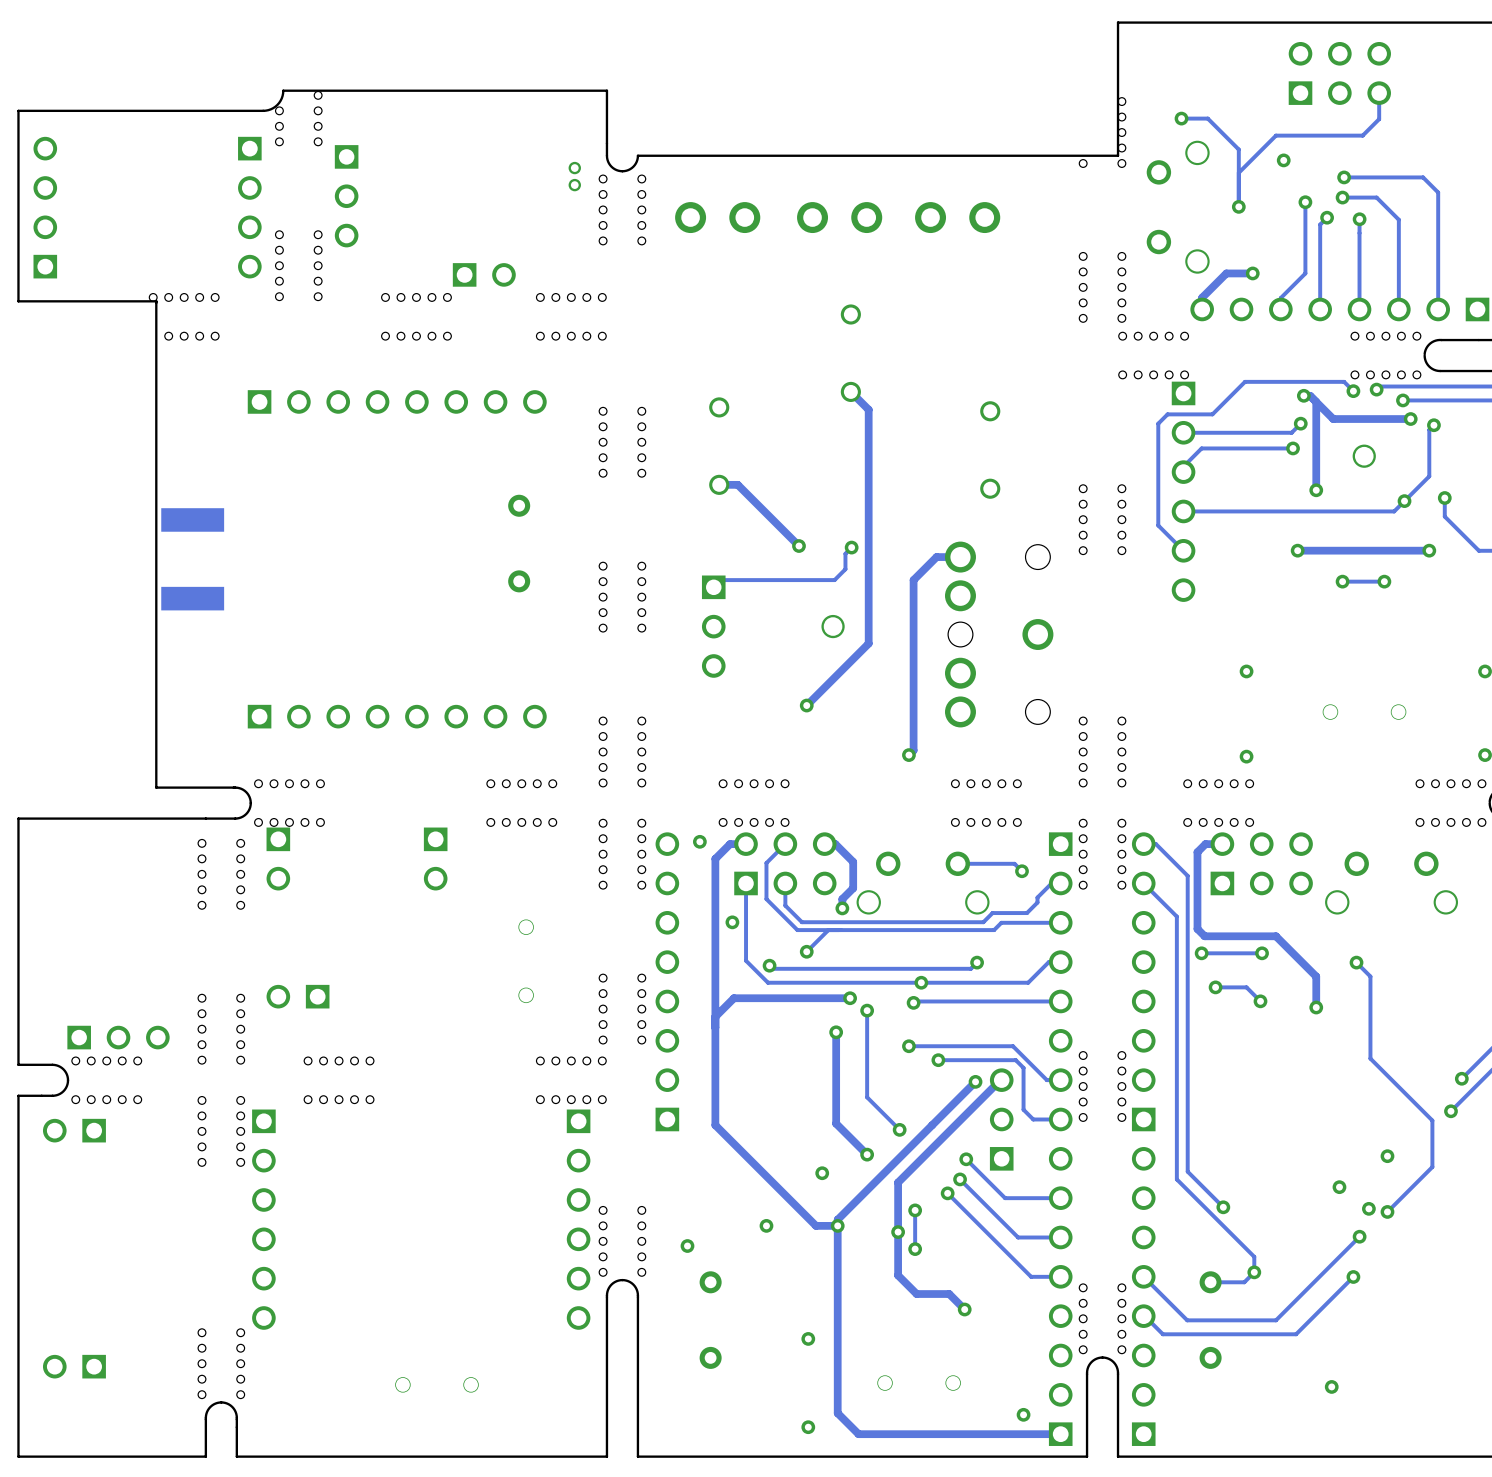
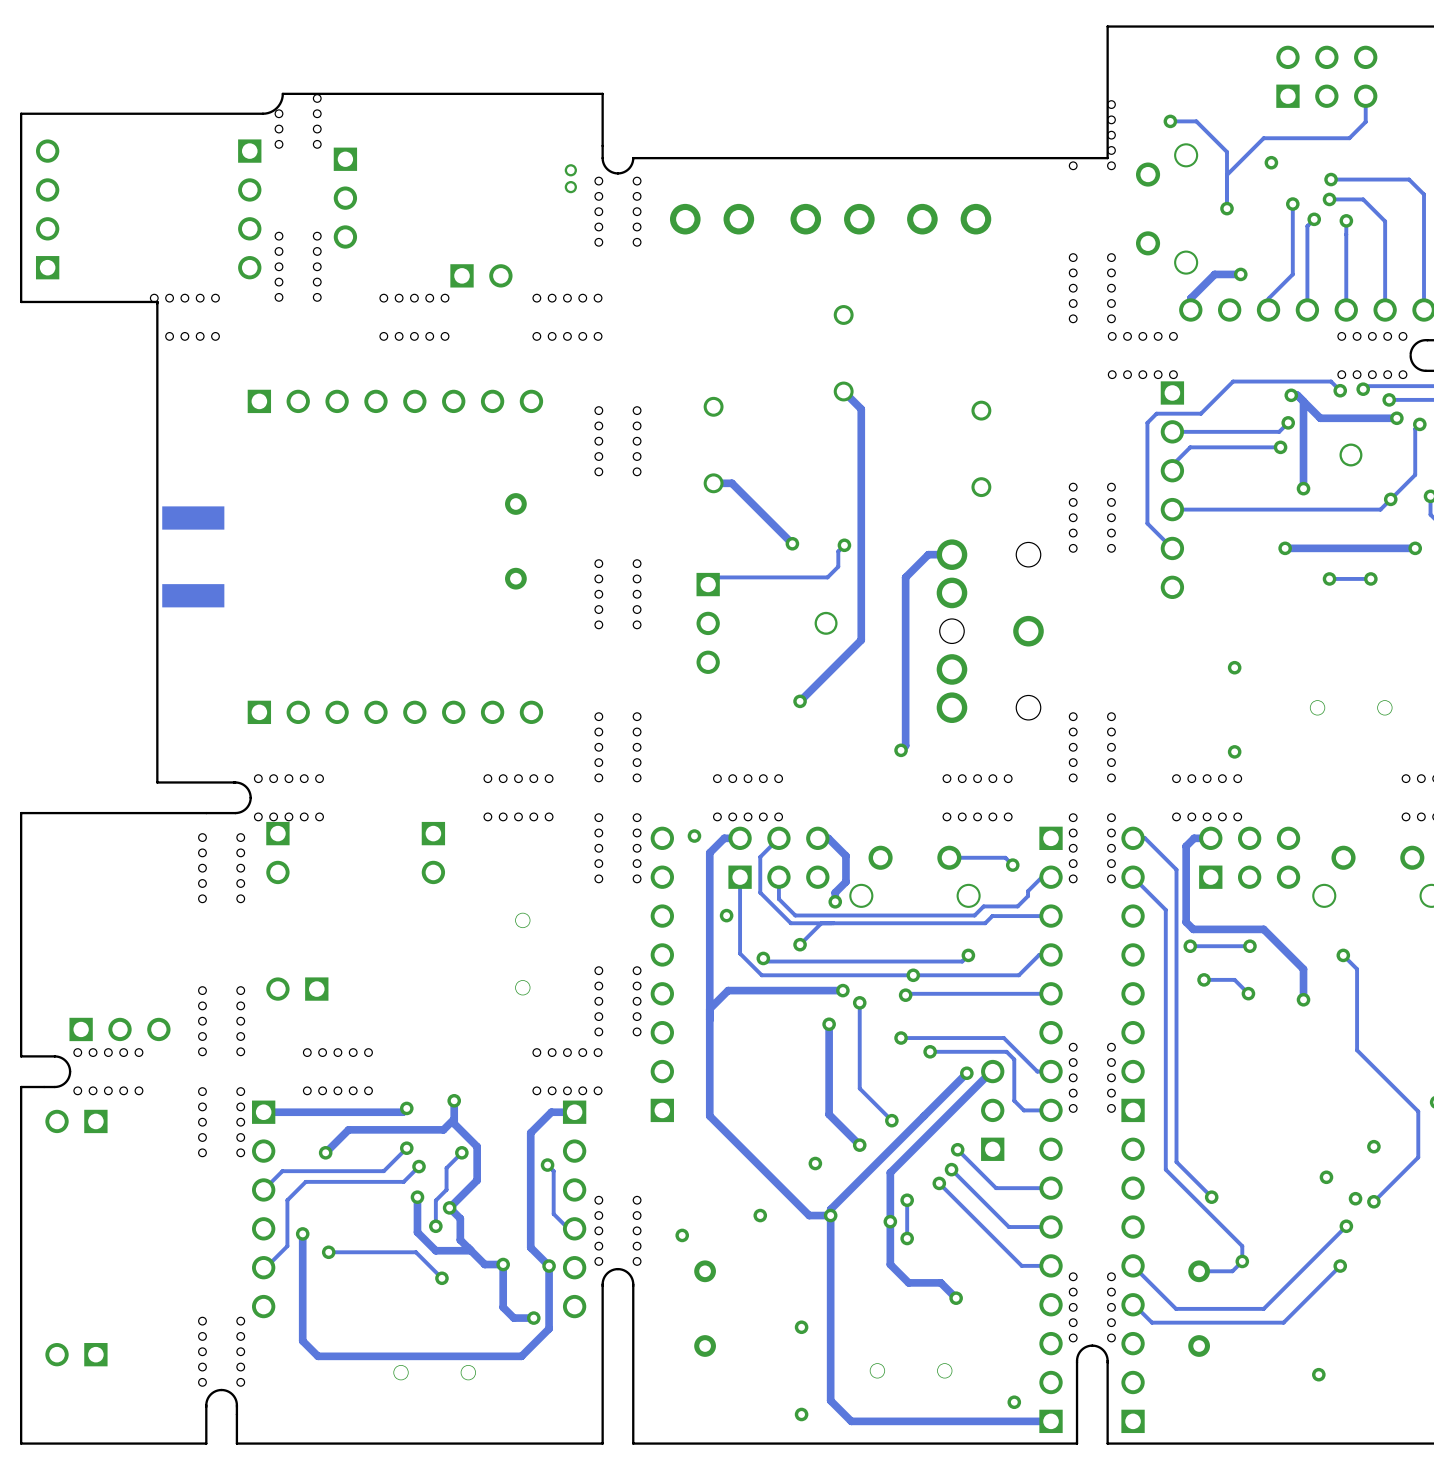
track: none -> (454, 1100) (454, 1123) (477, 1146) (477, 1180) (449, 1207) (460, 1218) (460, 1240) (484, 1264) (503, 1264) (503, 1307) (513, 1318) (533, 1318)
via: none -> (454, 1100)
track: none -> (406, 1108) (402, 1112) (263, 1112)
via: none -> (406, 1108)
track: none -> (574, 1112) (551, 1112) (530, 1132) (530, 1247) (549, 1266) (549, 1328) (521, 1356) (318, 1356) (302, 1341) (302, 1233)
track: none -> (454, 1119) (443, 1129) (348, 1129) (325, 1152)
track: none -> (406, 1148) (383, 1171) (282, 1171) (263, 1189)
via: none -> (406, 1148)
via: none -> (325, 1152)
track: none -> (461, 1152) (446, 1168) (446, 1189) (435, 1200) (435, 1226)
via: none -> (461, 1152)
track: none -> (547, 1165) (553, 1171) (553, 1214) (568, 1228) (574, 1228)
via: none -> (547, 1165)
track: none -> (419, 1166) (403, 1181) (305, 1181) (287, 1200) (287, 1246) (263, 1267)
via: none -> (419, 1166)
track: none -> (417, 1197) (417, 1232) (435, 1250) (471, 1250)
via: none -> (417, 1197)
via: none -> (449, 1207)
via: none -> (435, 1226)
via: none -> (302, 1233)
track: none -> (328, 1252) (415, 1252) (441, 1278)
via: none -> (328, 1252)
via: none -> (503, 1264)
via: none -> (549, 1266)
via: none -> (441, 1278)
via: none -> (533, 1318)

